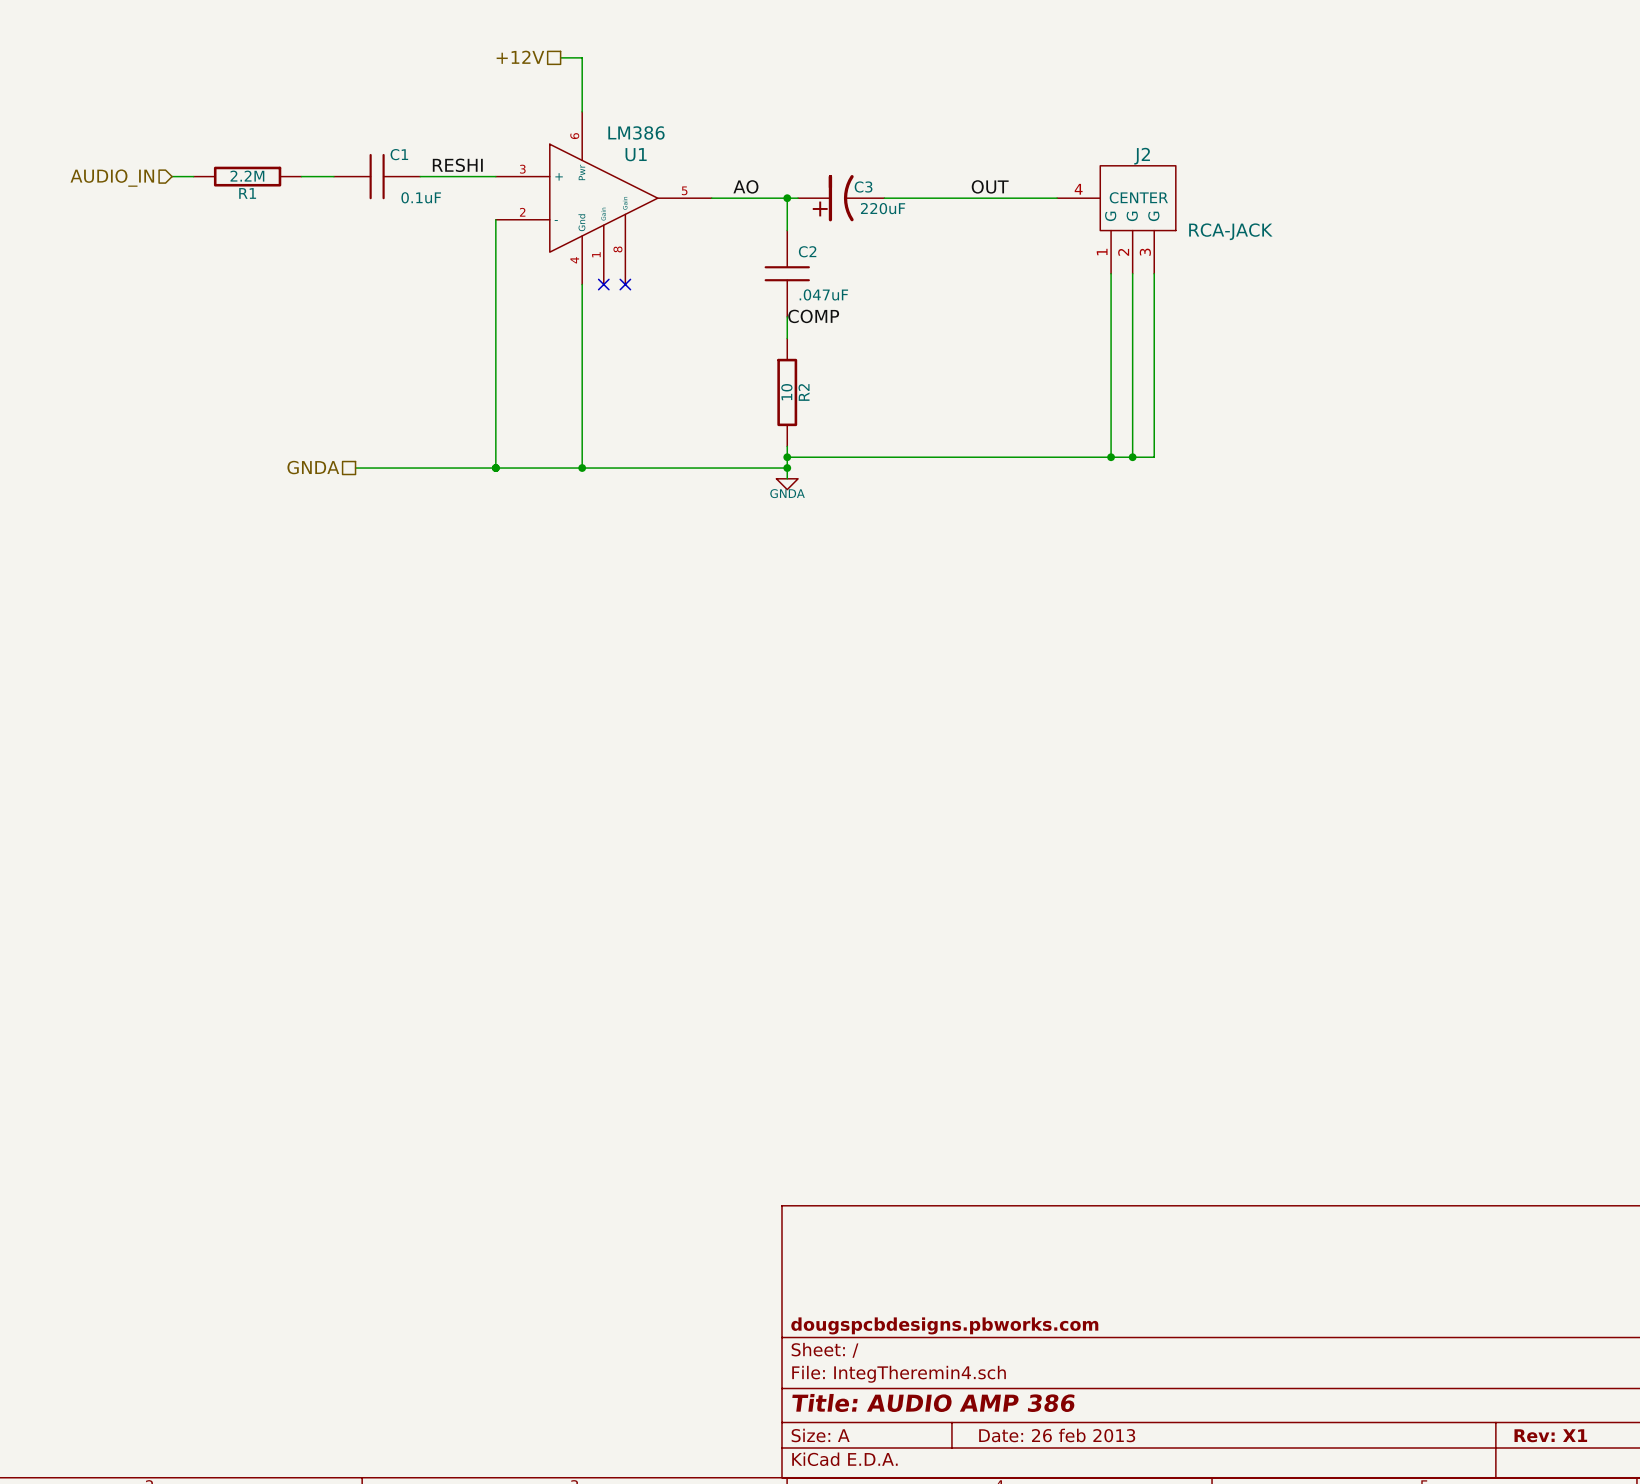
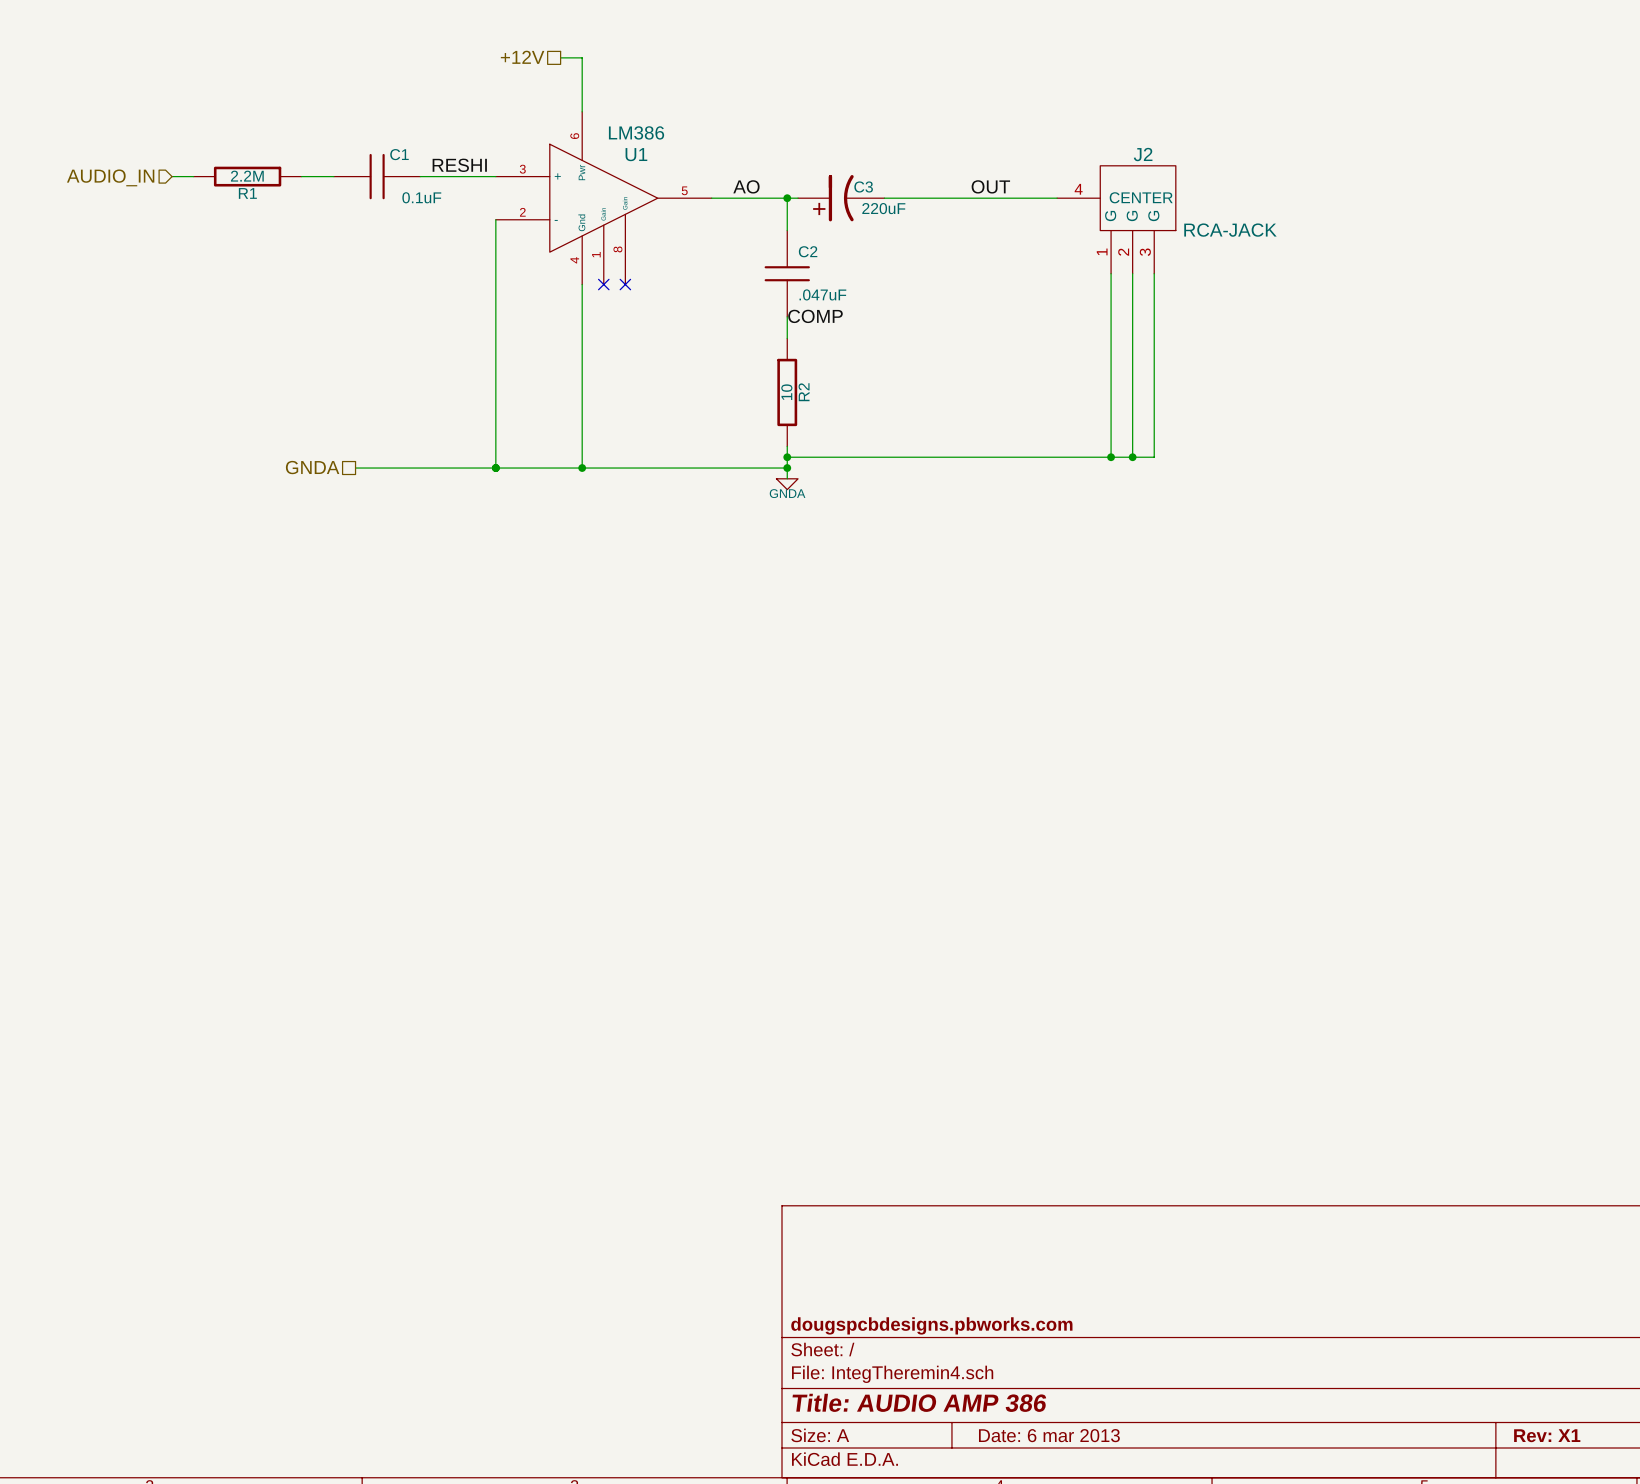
title block: Date: 26 feb 2013 (1057, 1435) -> Date: 6 mar 2013 (1049, 1435)

